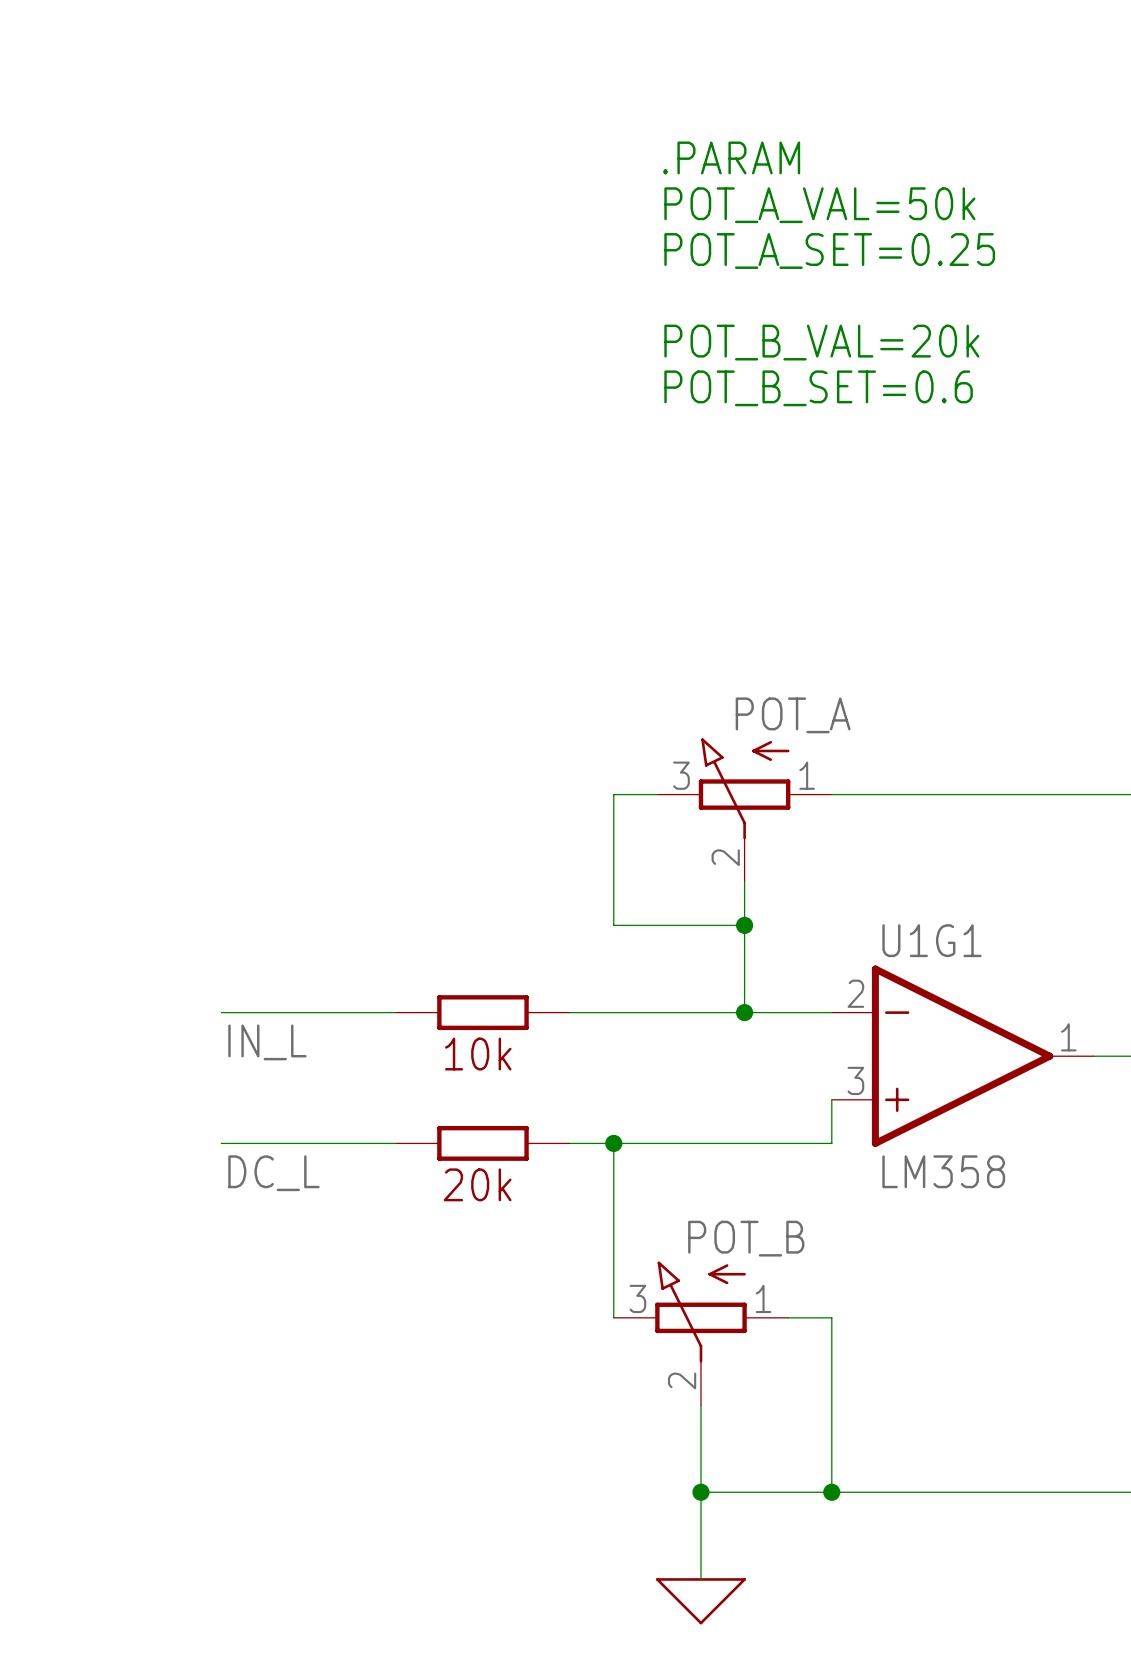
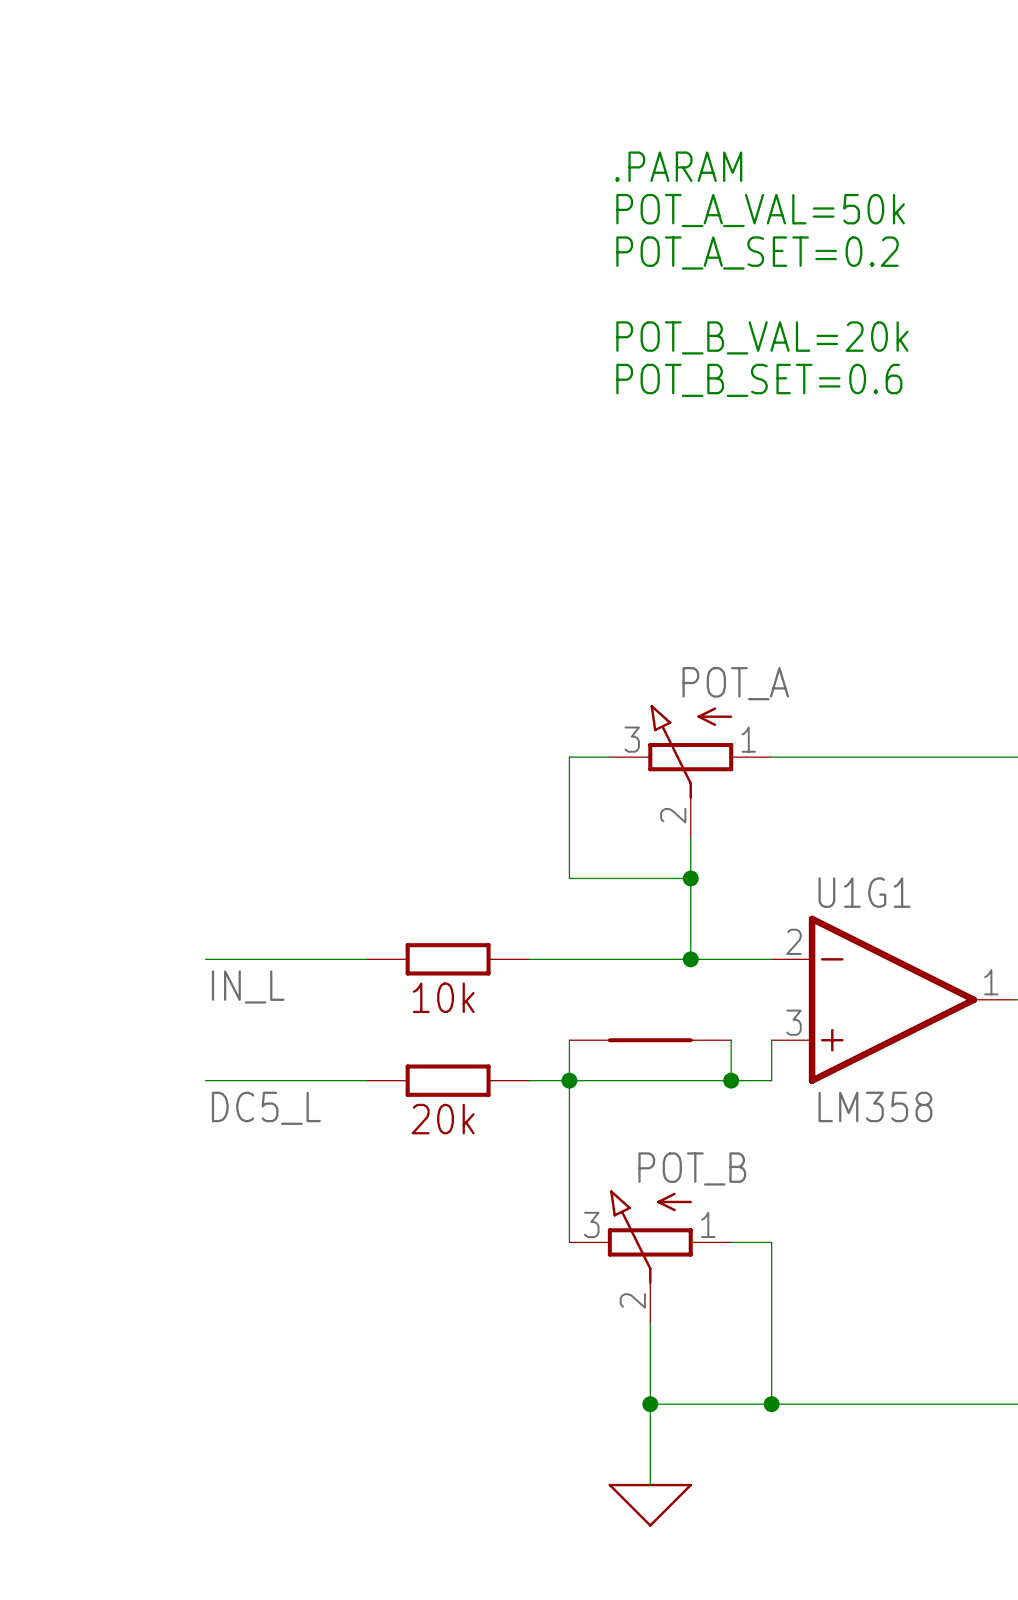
text: POT_A_SET=0.25 (829, 250) -> POT_A_SET=0.2 (757, 252)
wire: none -> (569, 1040) (569, 1080)
part: none -> (650, 1040)
wire: none -> (731, 1040) (731, 1080)
junction: none -> (731, 1080)
label: DC_L (273, 1173) -> DC5_L (266, 1108)

